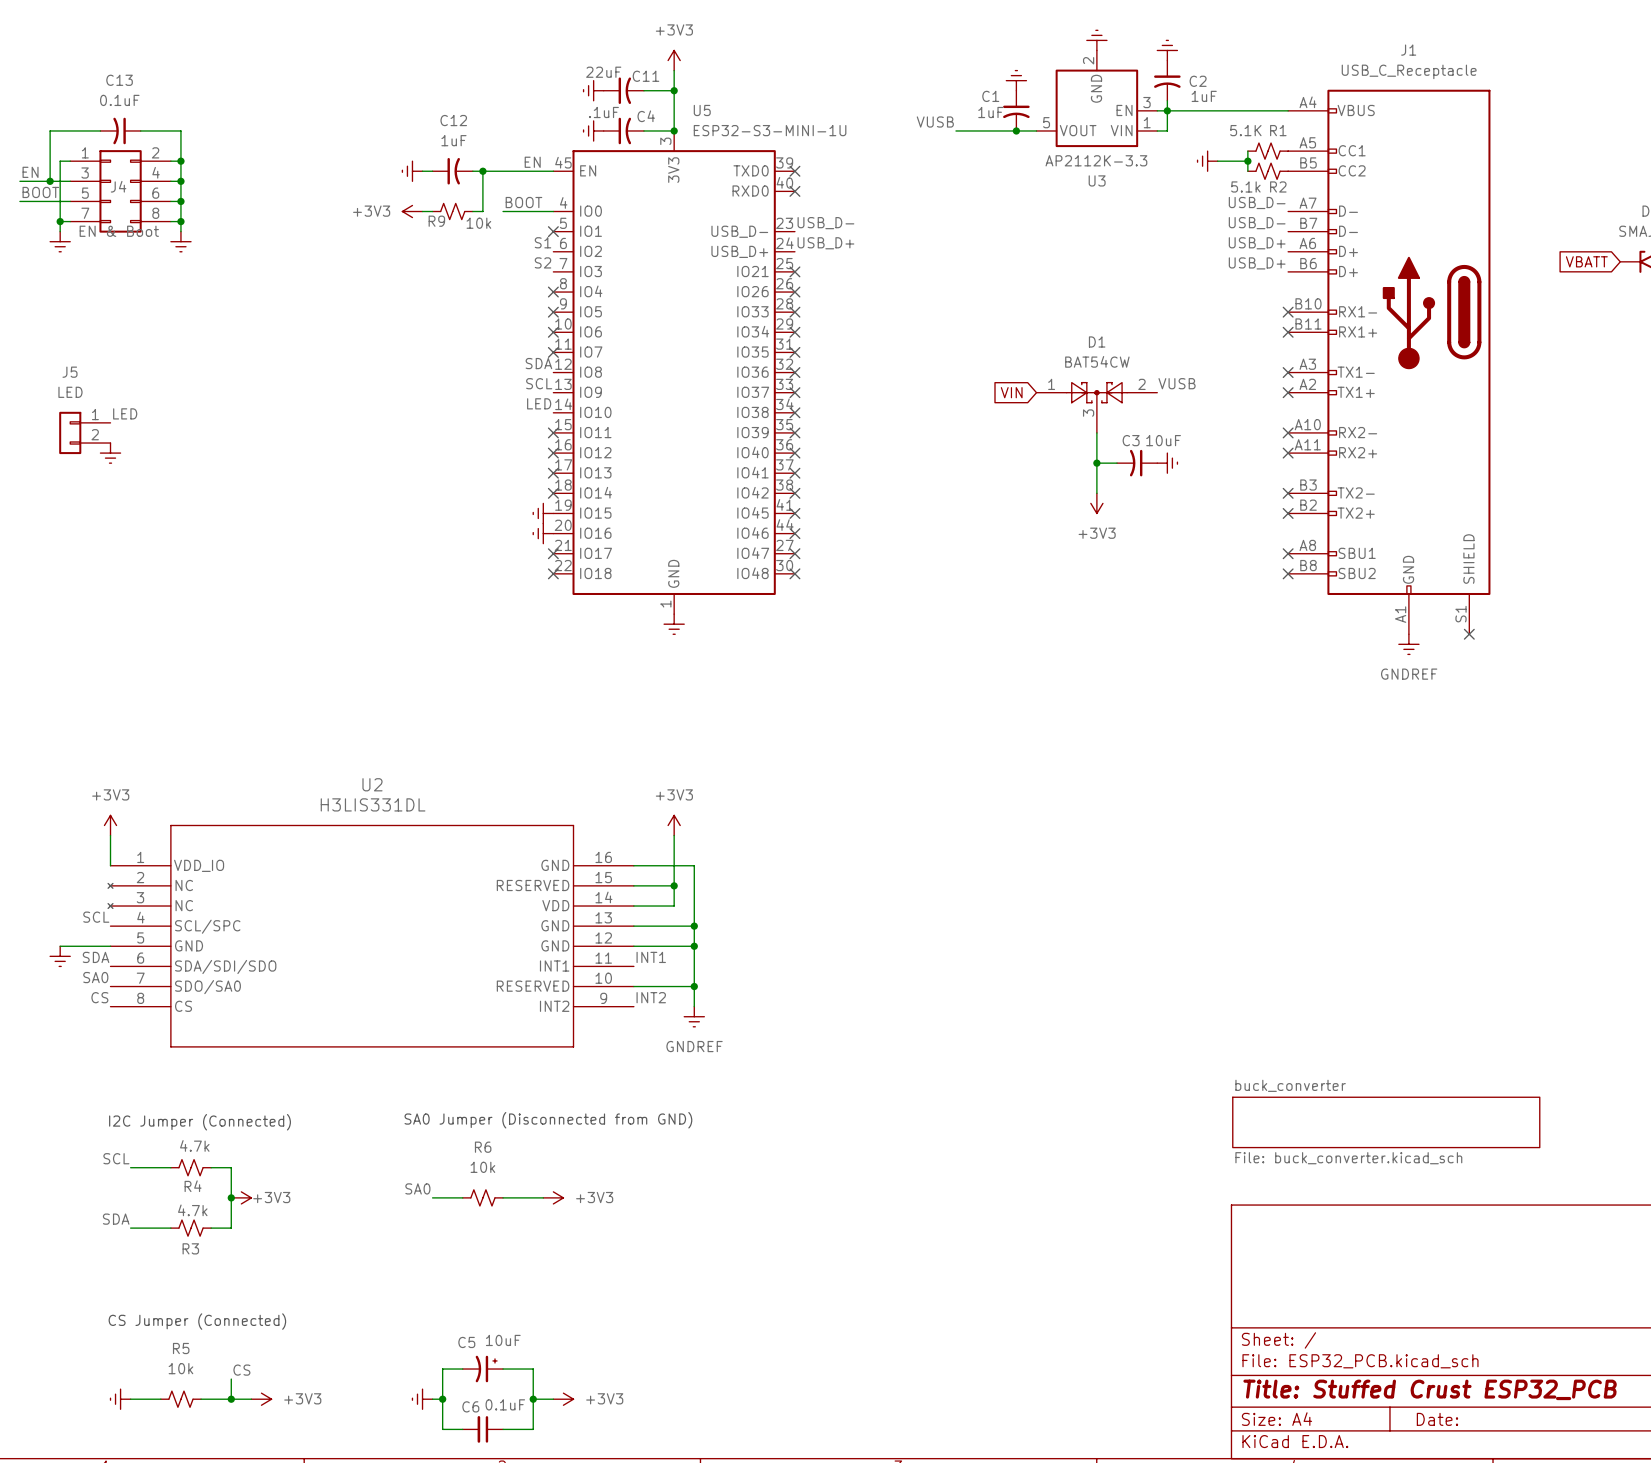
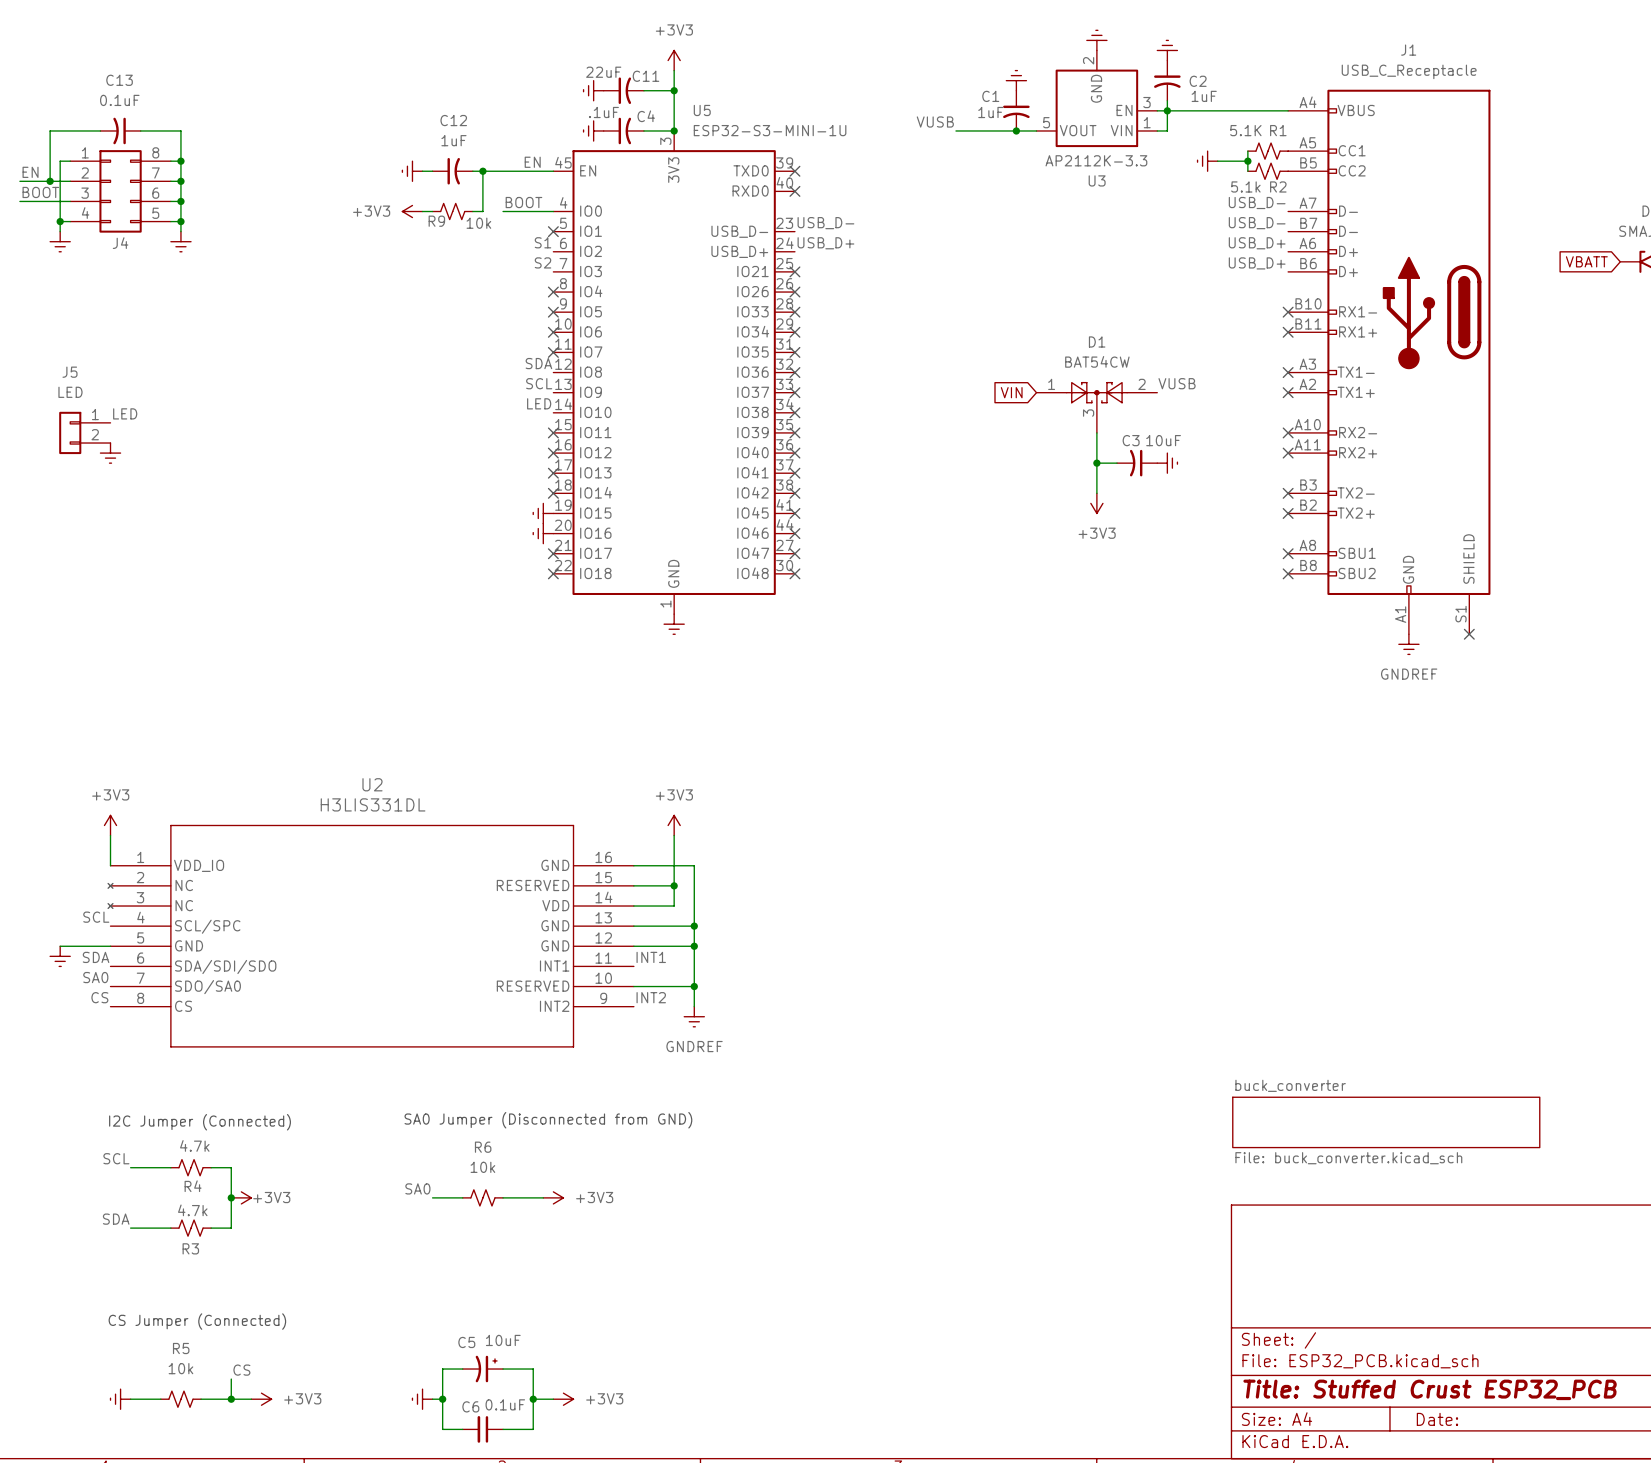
J4 pin number: 2 (155, 152) -> 8 (155, 152)
J4 pin number: 4 (156, 172) -> 7 (155, 173)
J4 pin number: 3 (85, 173) -> 2 (85, 173)
J4 name position: J4 (118, 186) -> J4 (120, 243)
J4 pin number: 5 (85, 193) -> 3 (85, 193)
J4 pin number: 7 (85, 213) -> 4 (85, 213)
J4 pin number: 8 (155, 213) -> 5 (155, 213)
J4 value: EN & Boot (119, 231) -> none

